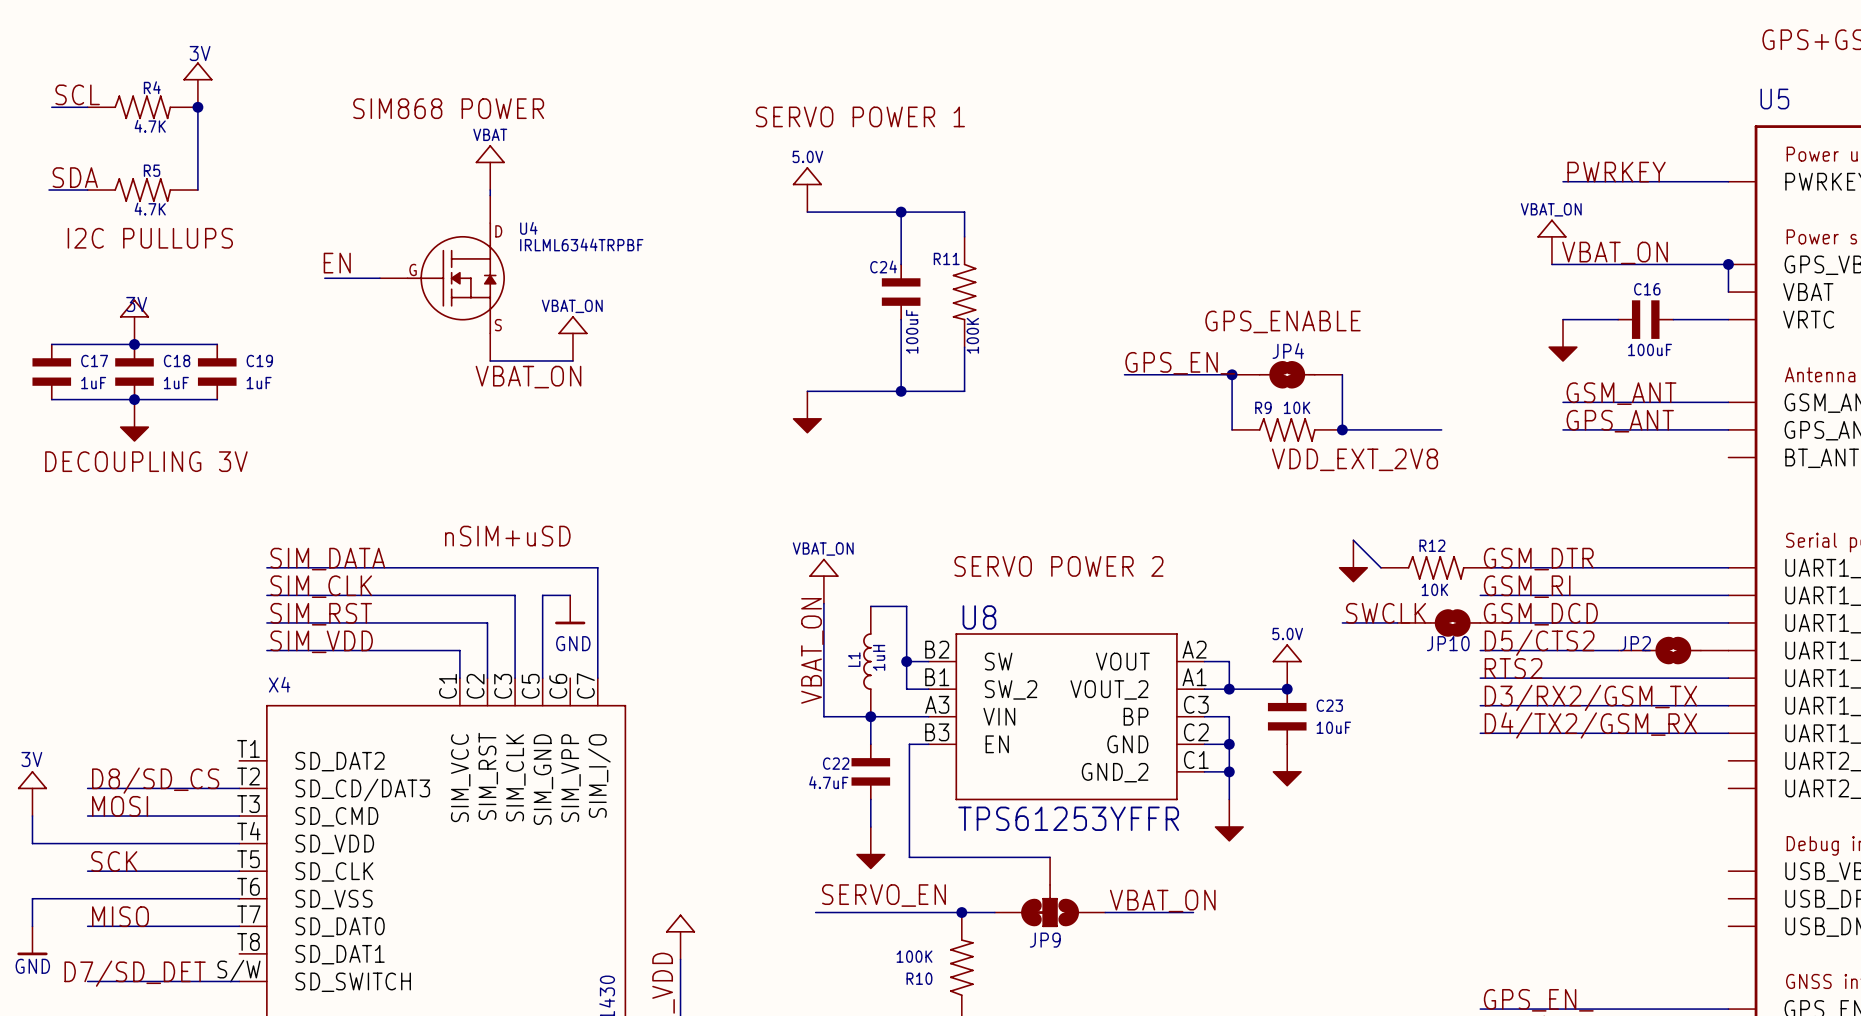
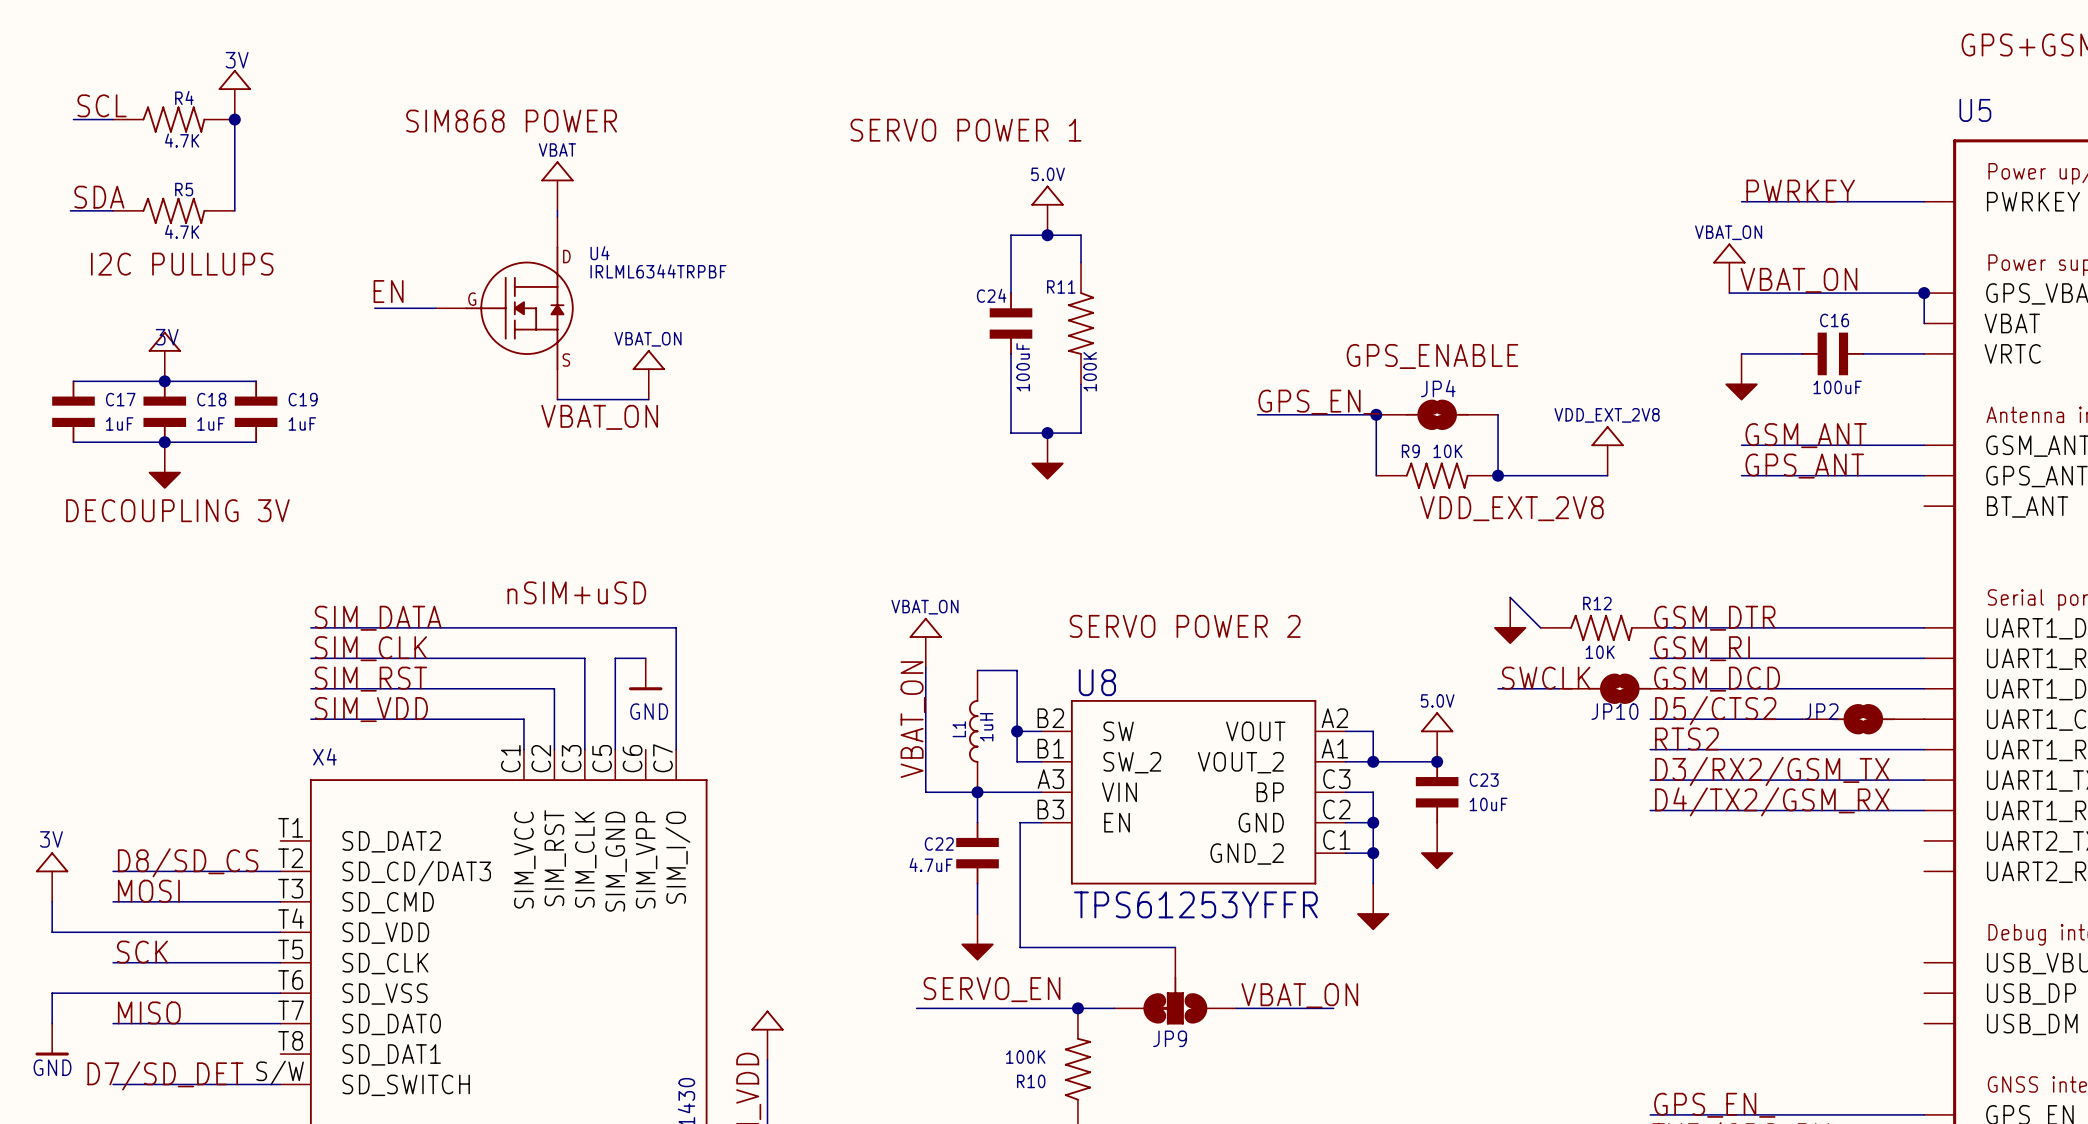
power symbol position: 5.0V (807, 189) -> 5.0V (1047, 210)
wire: (807, 212) (901, 212) -> none
junction position: (901, 212) -> (1047, 235)
wire: (807, 391) (901, 391) -> none
junction position: (901, 391) -> (1047, 433)
power symbol: none -> VDD_EXT_2V8 (1607, 450)
power symbol position: (807, 412) -> (1047, 456)

